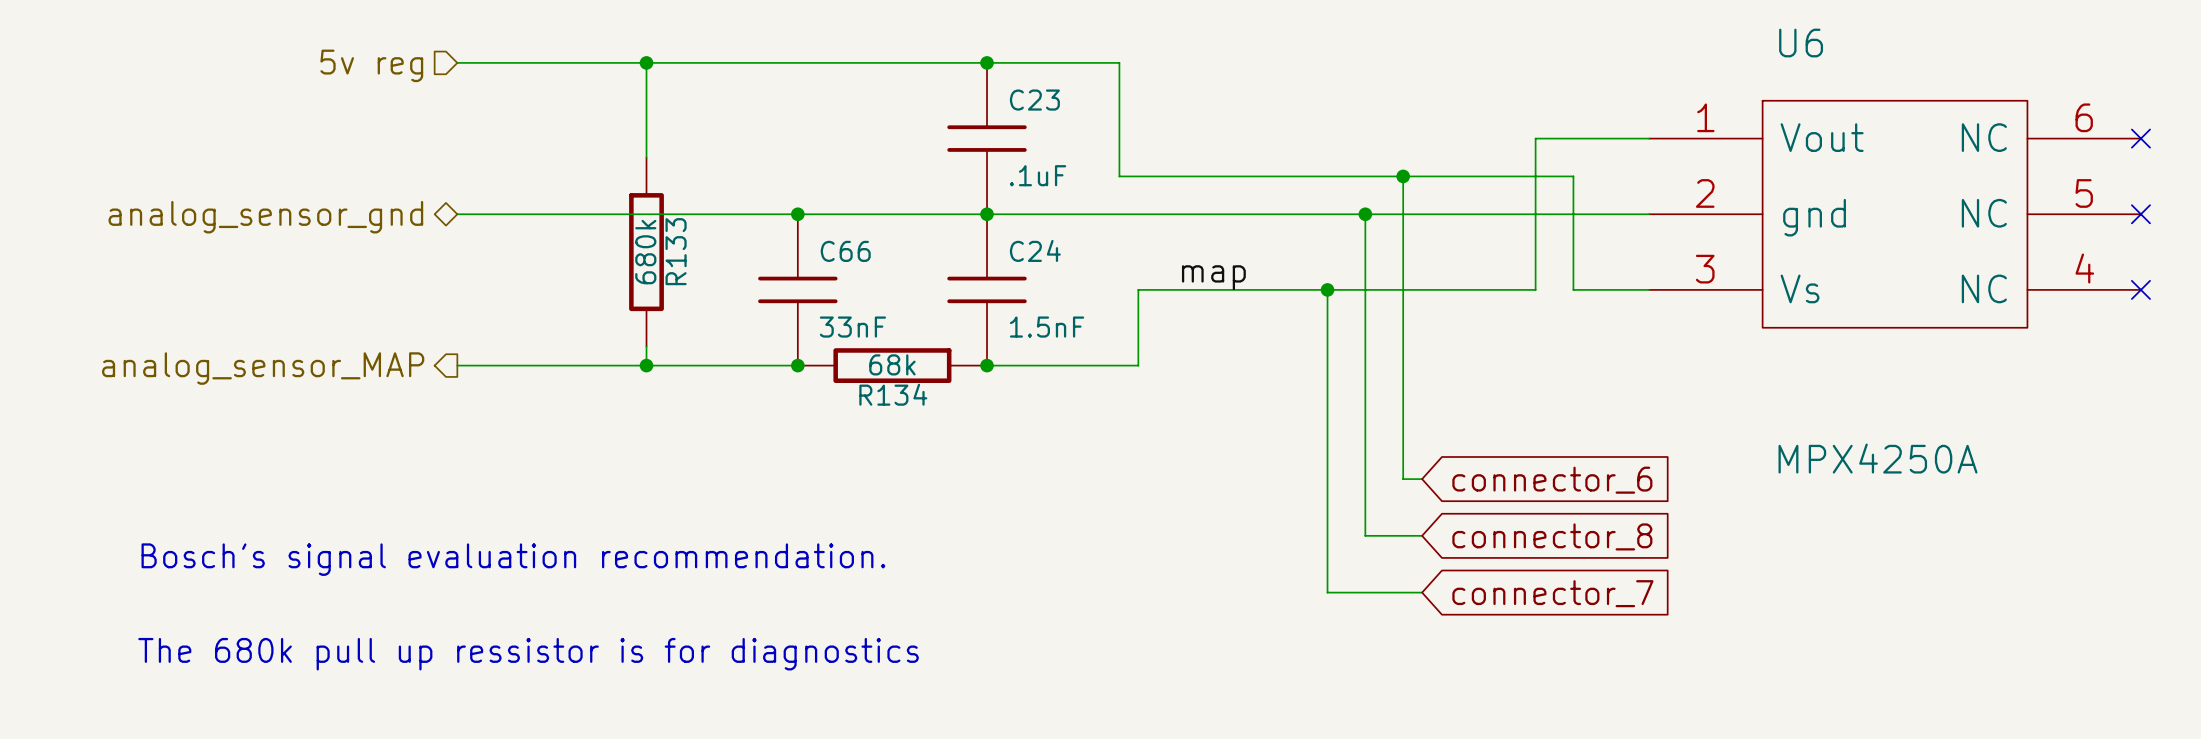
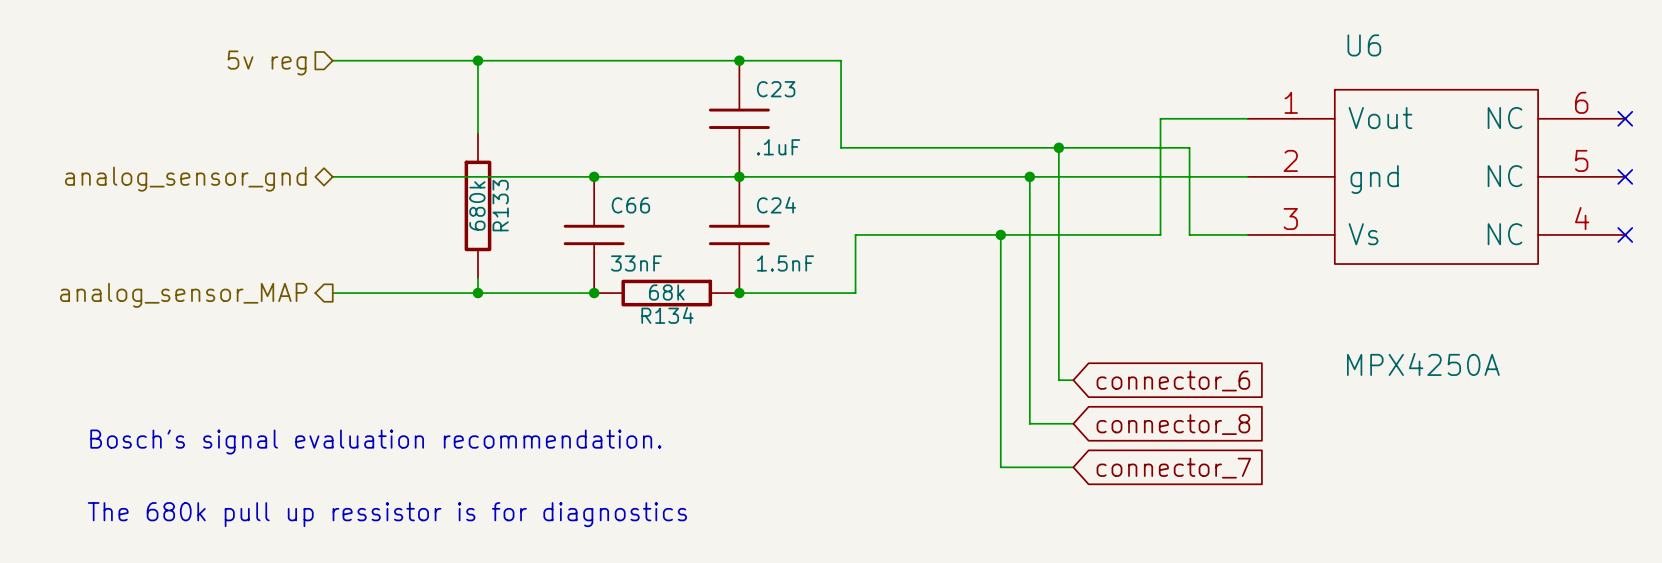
label: map (1213, 277) -> none

